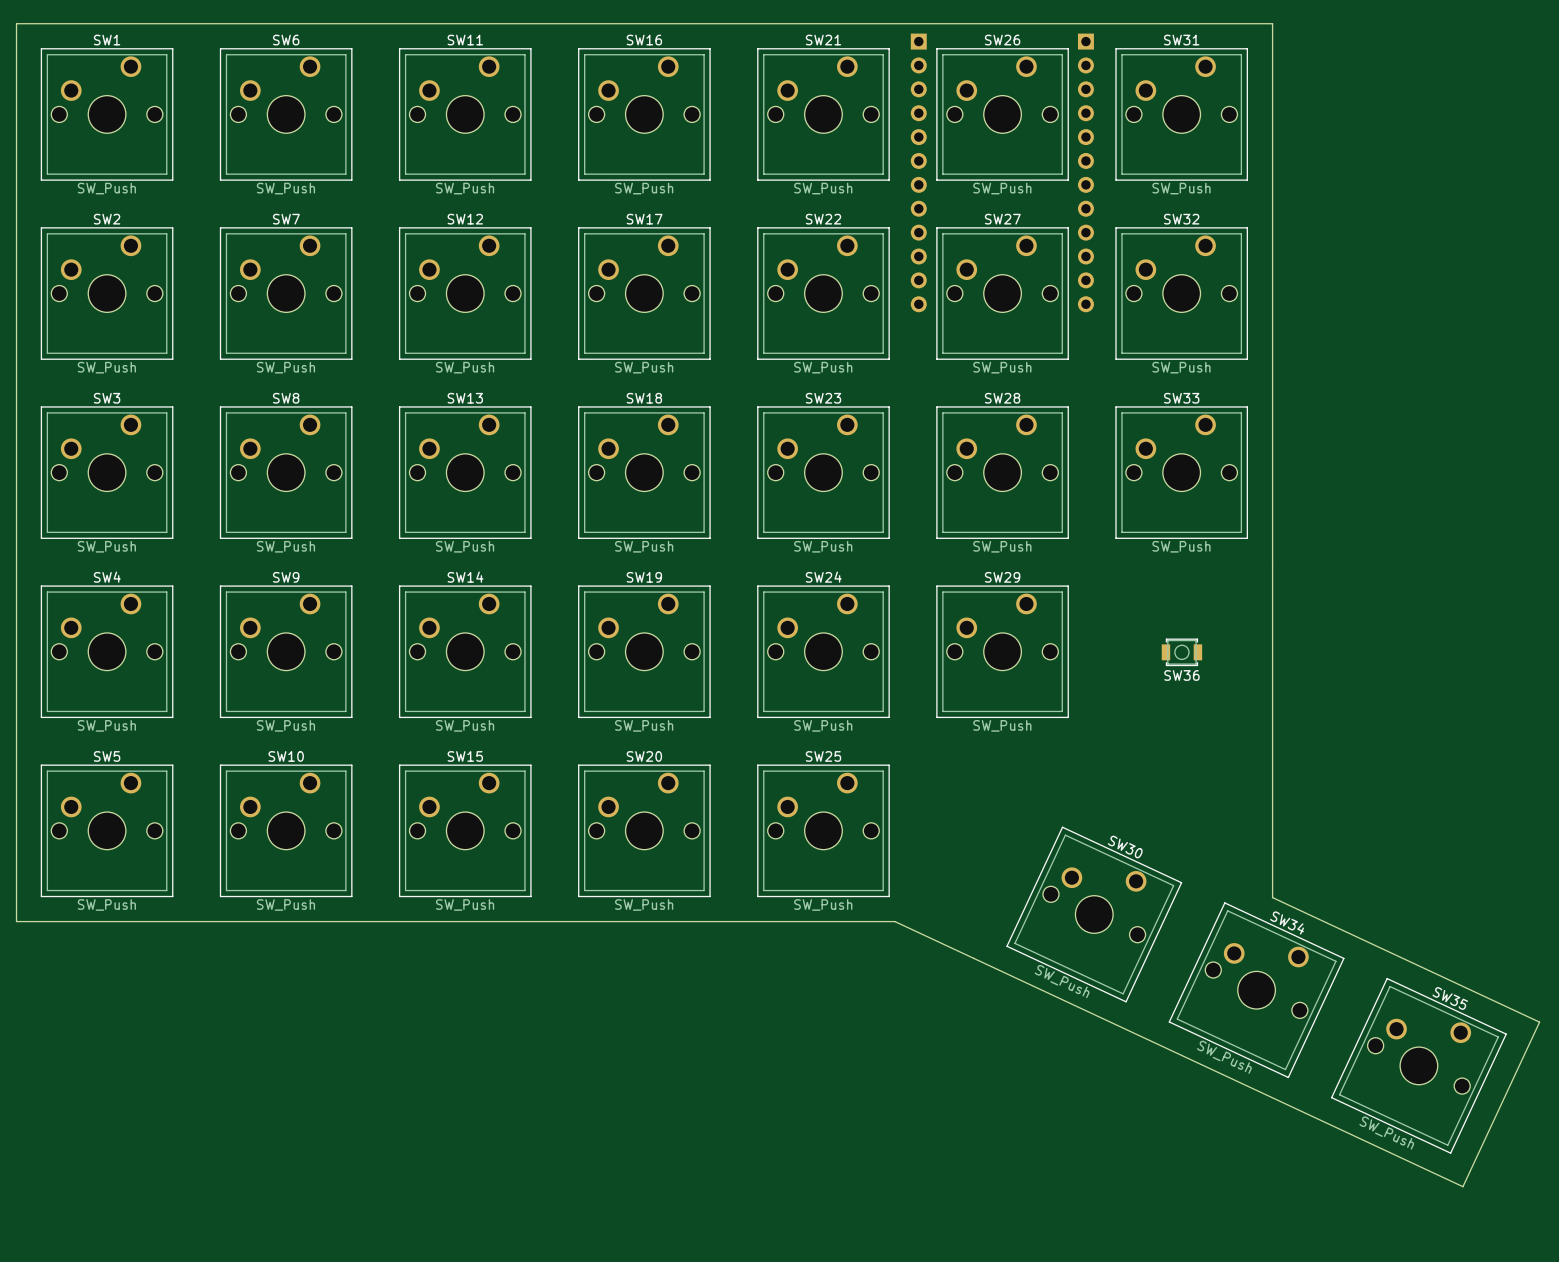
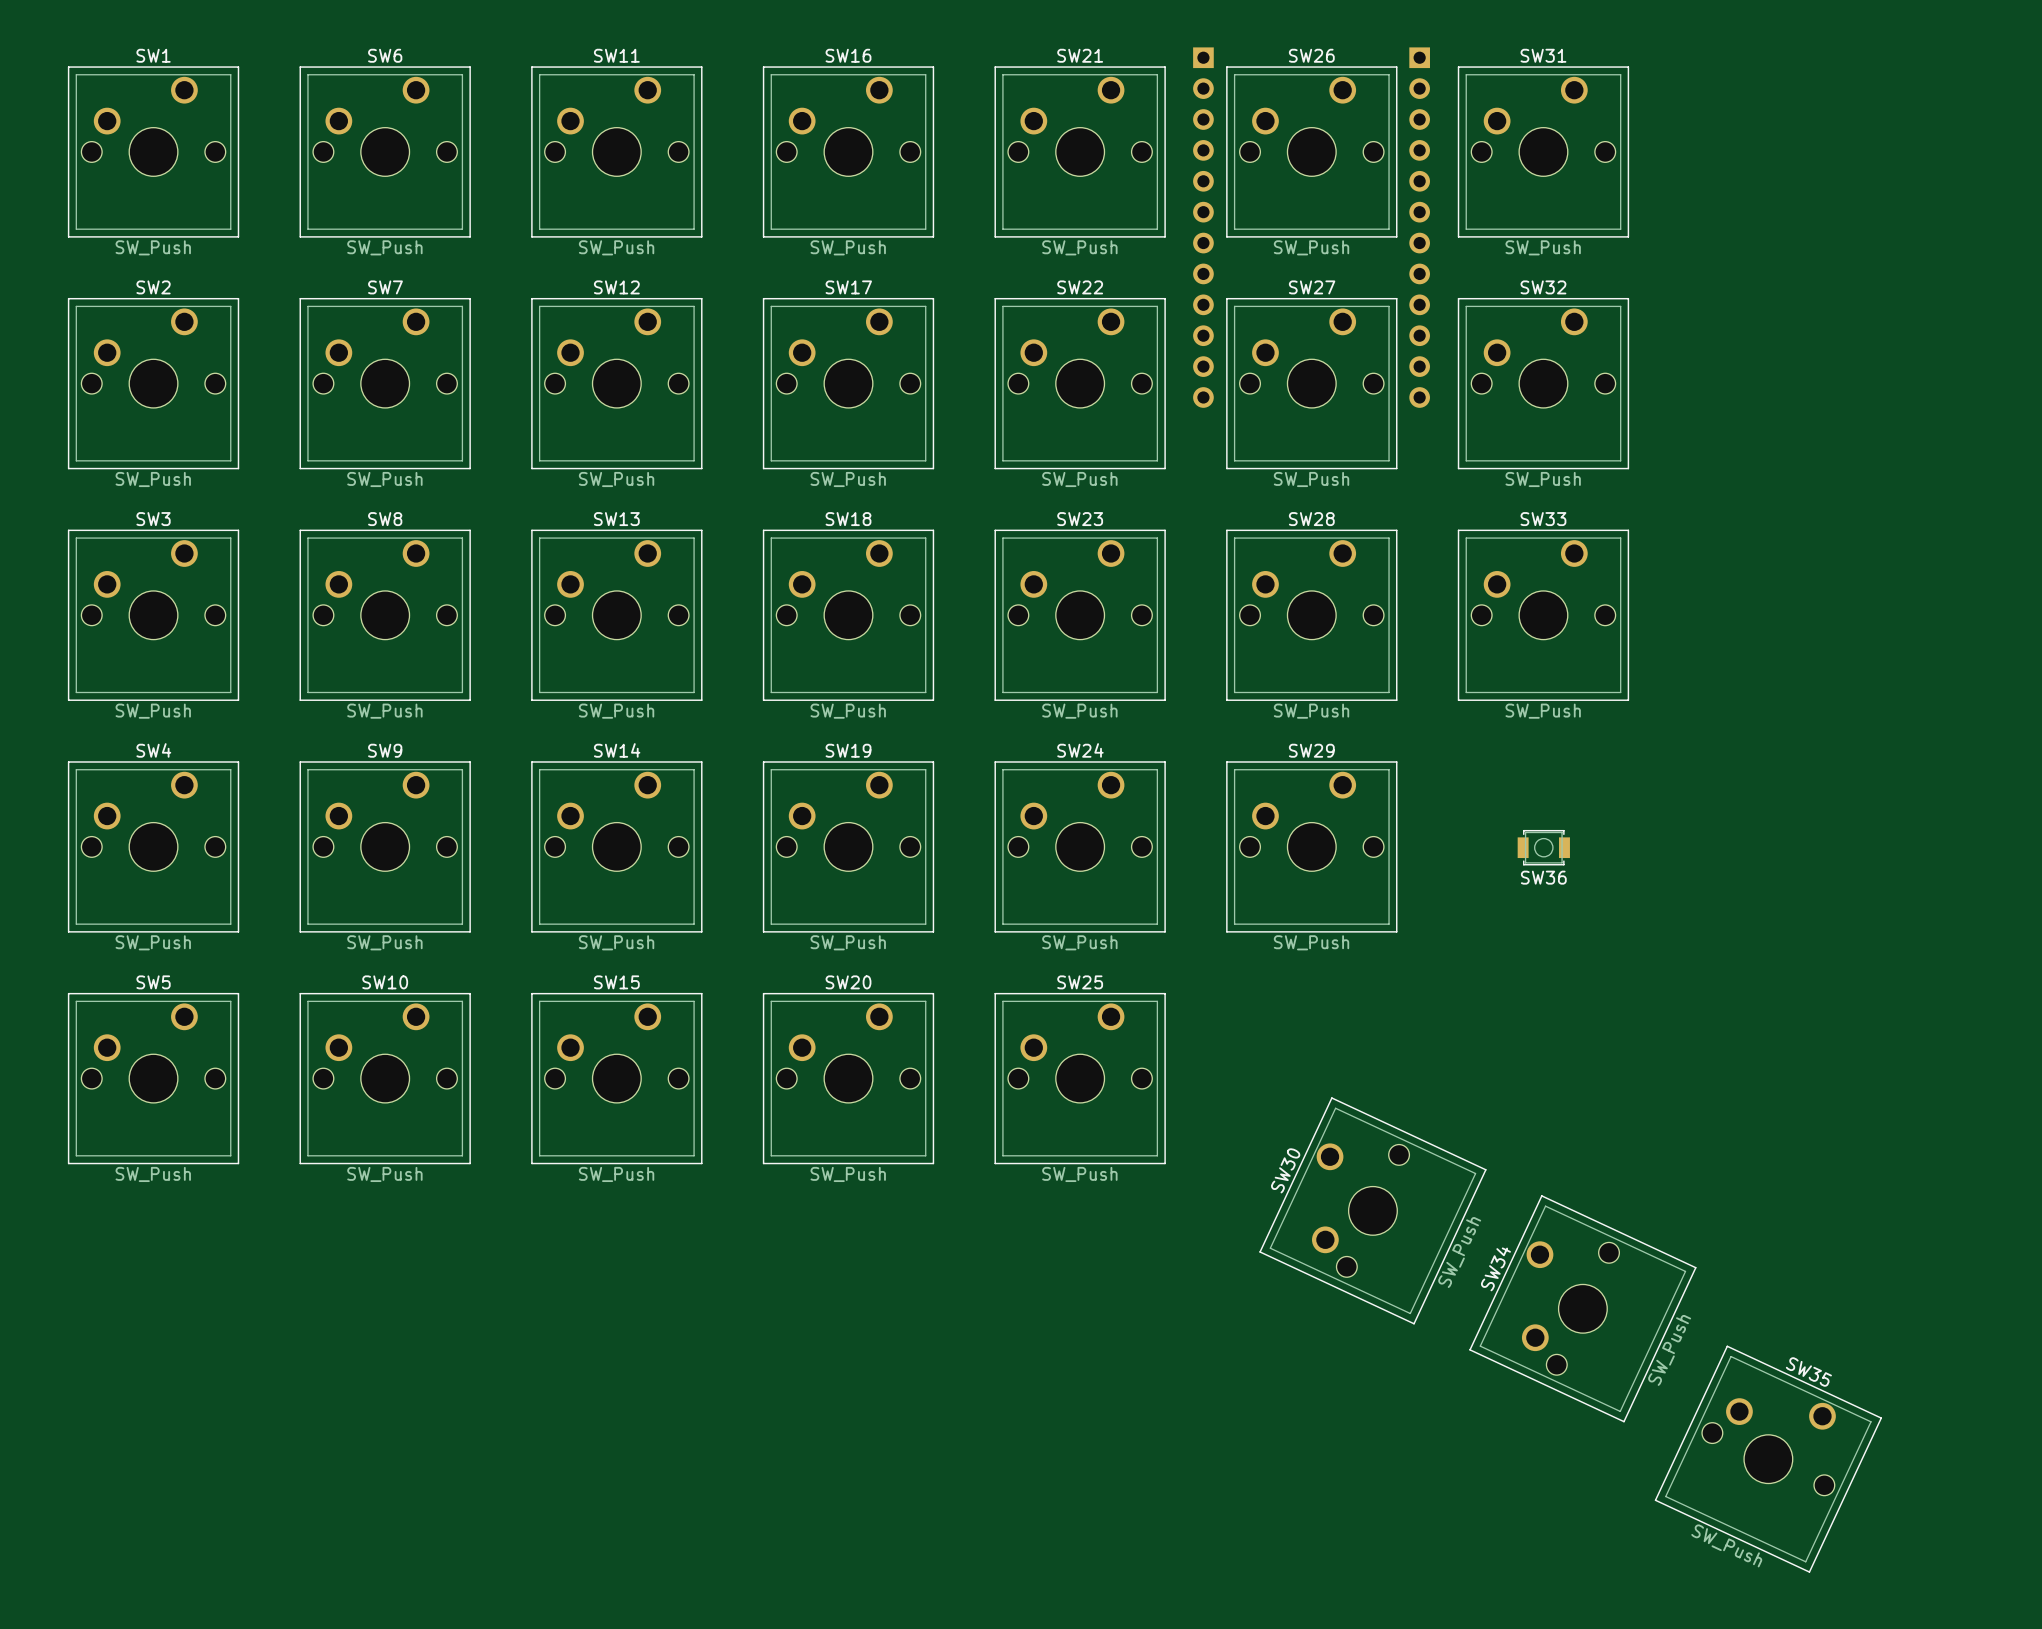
board edge: (16, 23) (1272, 23) (1272, 897) (1539, 1022) (1462, 1186) (894, 921) (16, 921) (16, 23) -> none
SW30 rotation: 0° (1094, 914) -> 90° counterclockwise (1372, 1210)
SW34 rotation: 0° (1256, 990) -> 90° counterclockwise (1582, 1308)
SW35 position: (1418, 1065) -> (1768, 1459)

